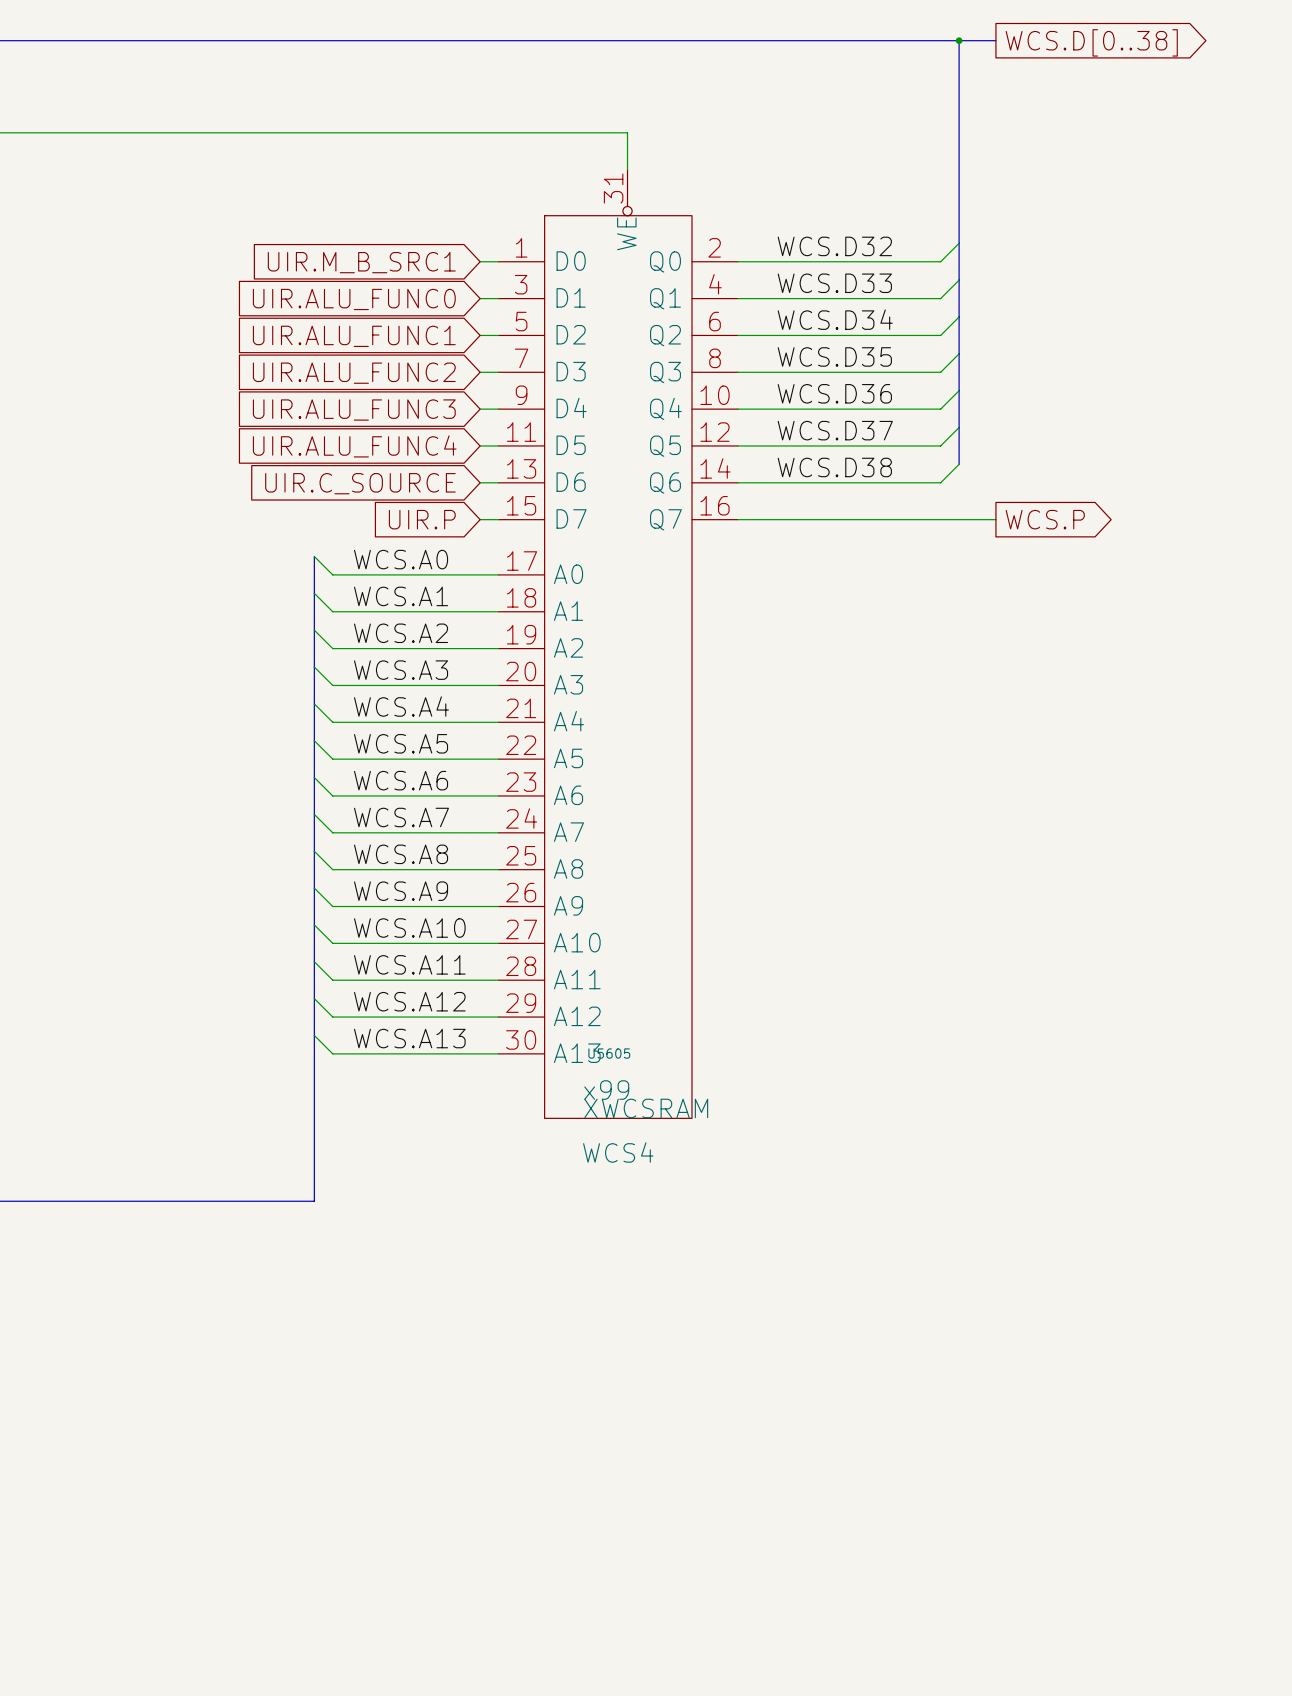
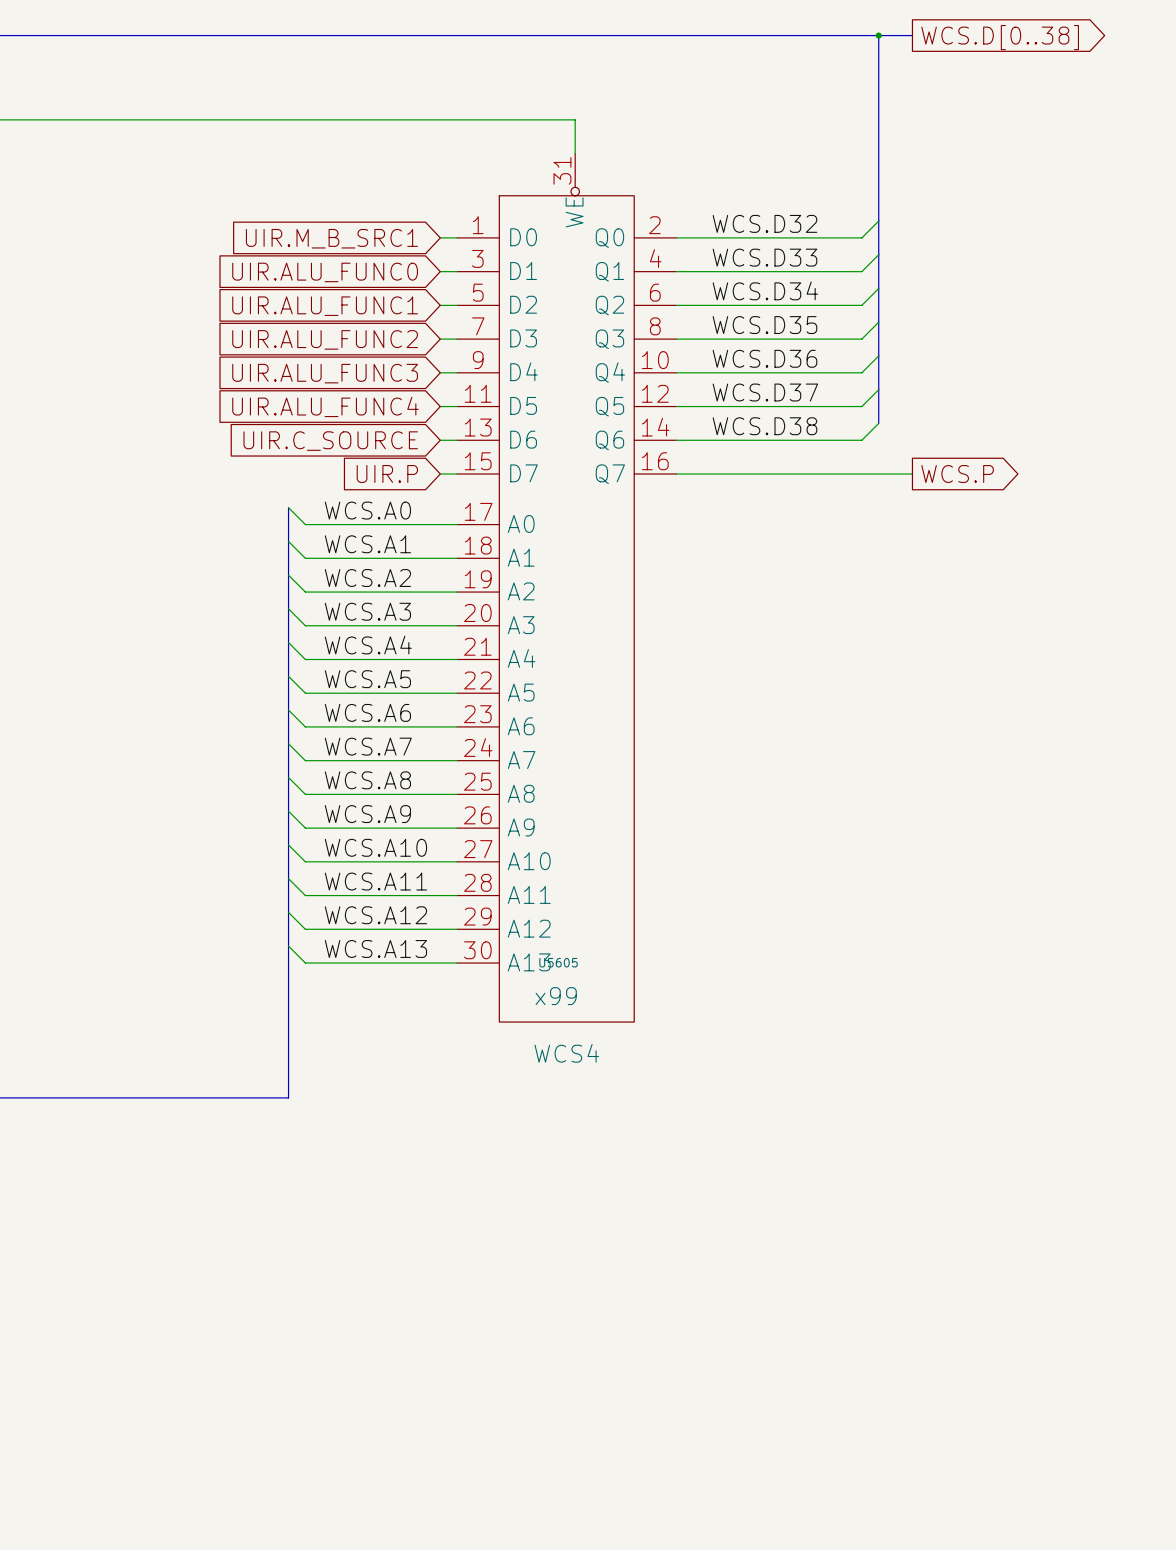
U5605 value: XWCSRAM (646, 1108) -> none

